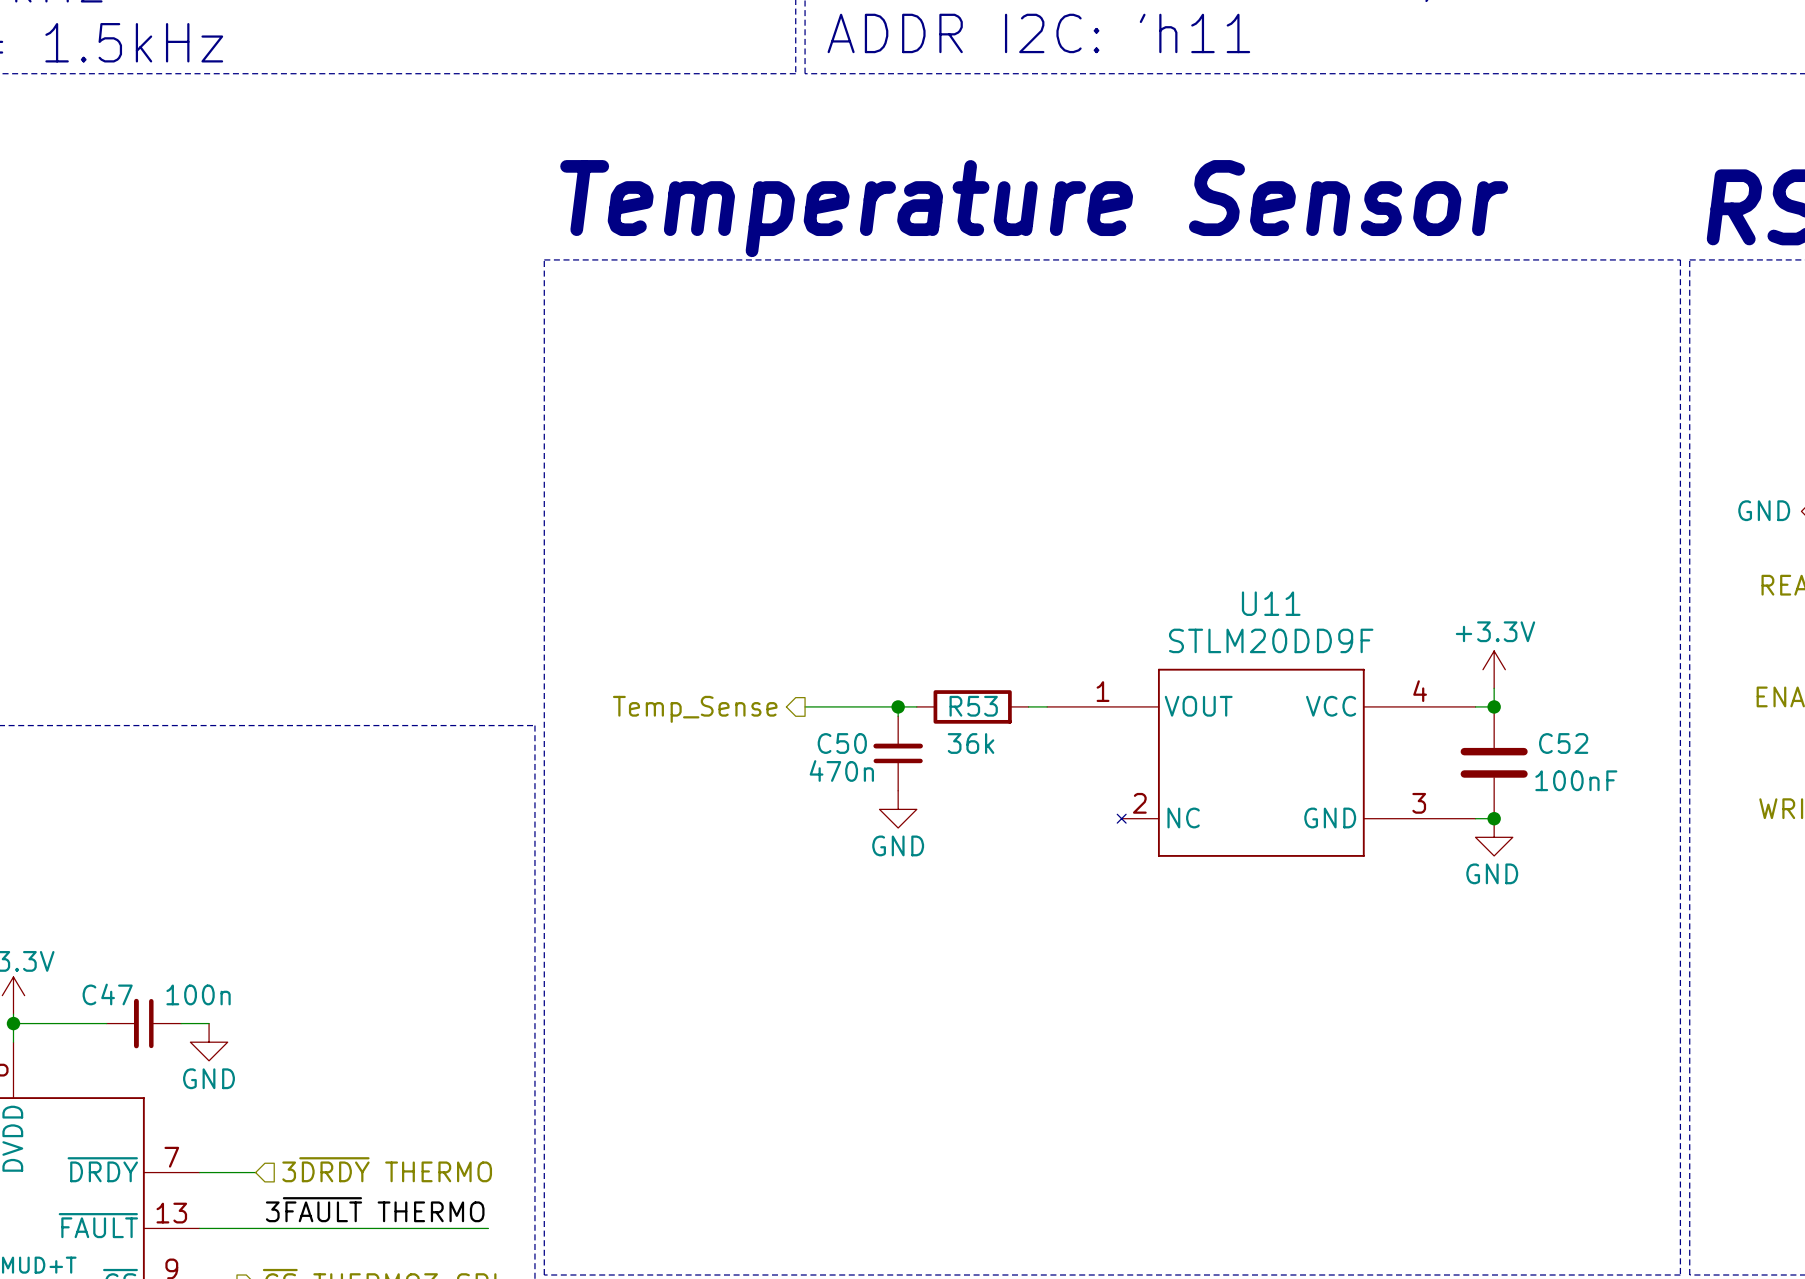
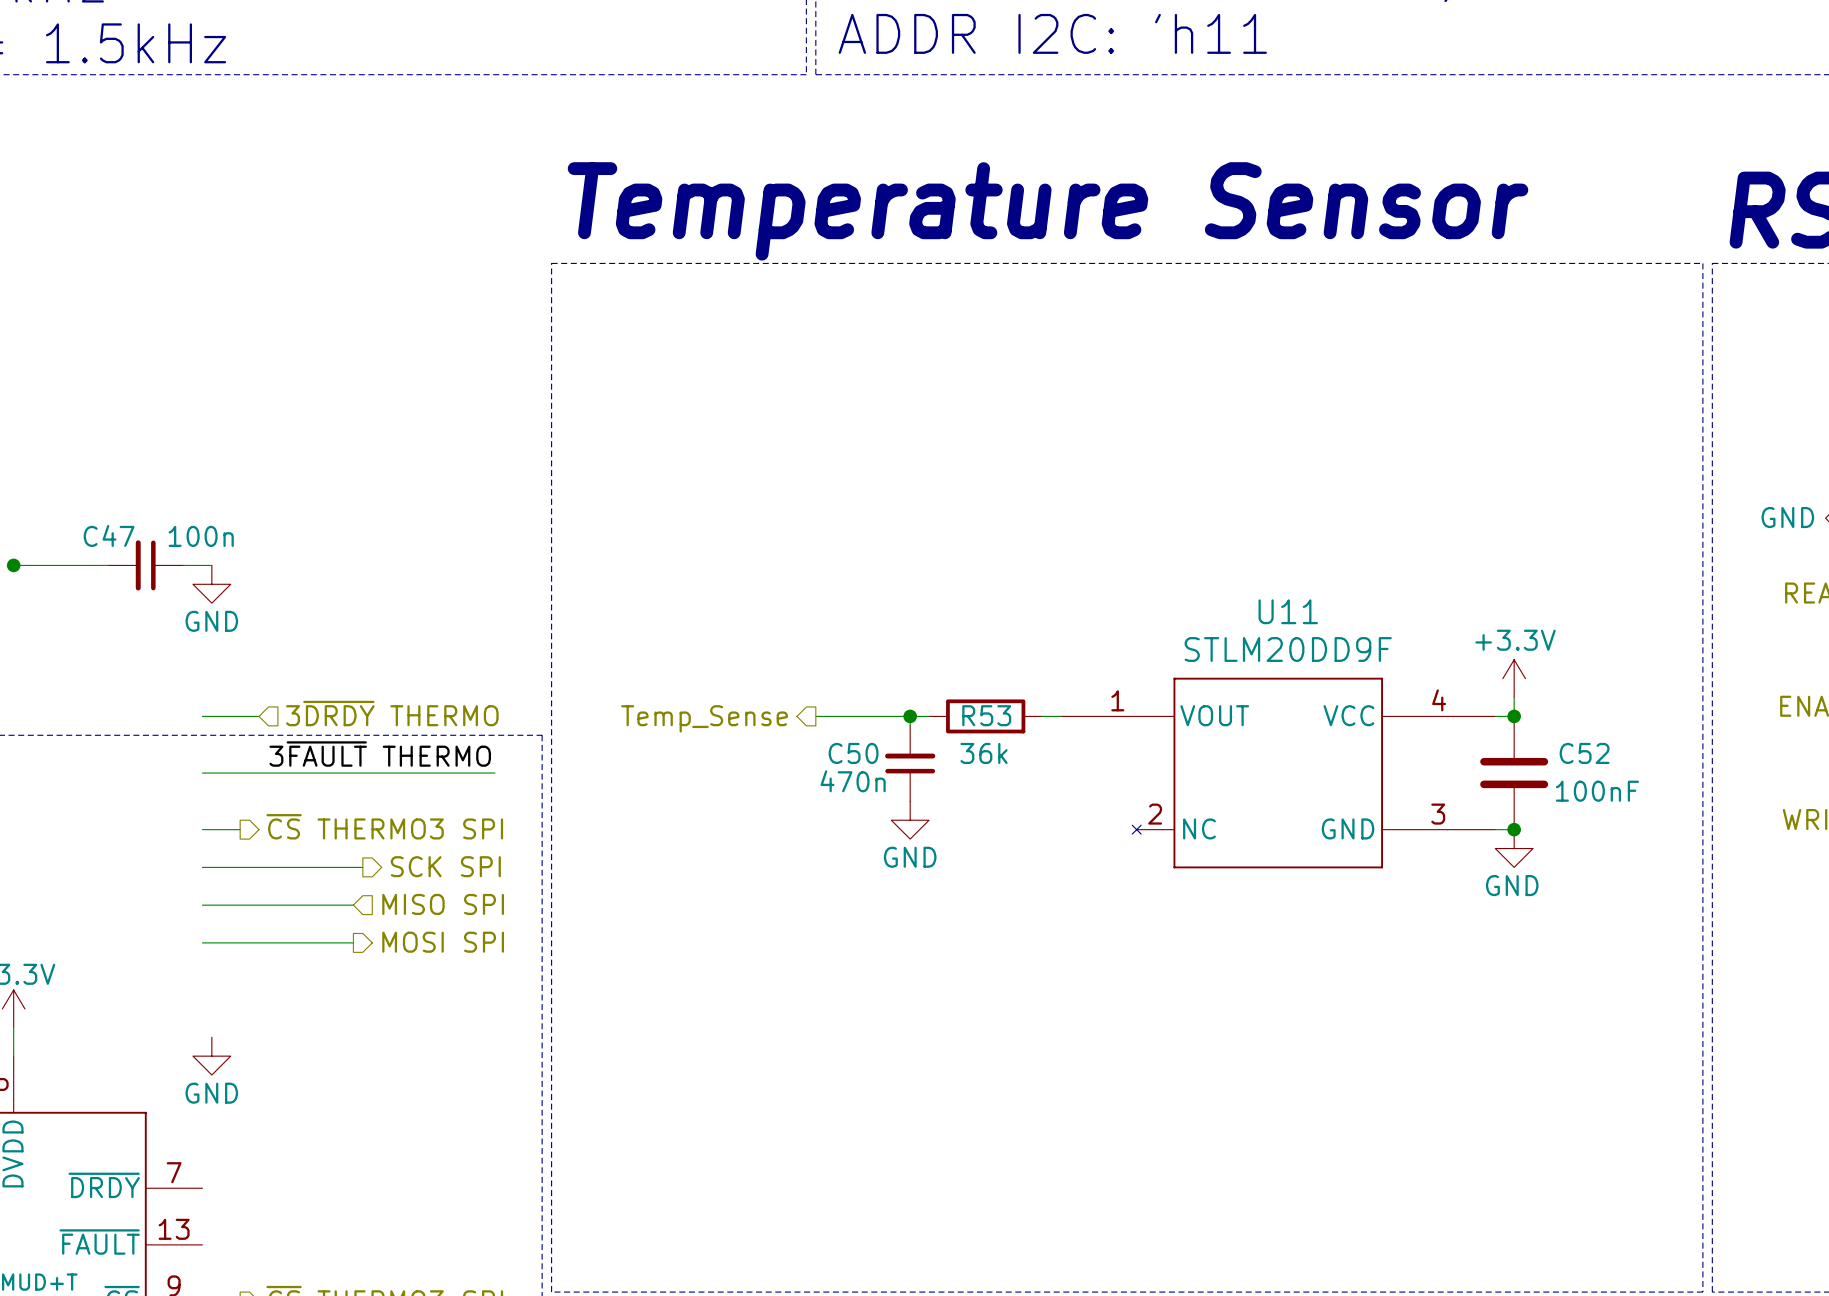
wire: none -> (13, 565) (108, 565)
junction: none -> (13, 565)
wire: none -> (183, 565) (211, 565)
power symbol: none -> GND (211, 584)
hierarchical label: none -> 3~{DRDY} THERMO (392, 713)
wire: none -> (202, 716) (259, 716)
label: none -> 3~{FAULT} THERMO (380, 754)
wire: none -> (202, 773) (494, 773)
hierarchical label: none -> ~{CS} THERMO3 SPI (384, 826)
wire: none -> (202, 829) (240, 829)
wire: none -> (202, 867) (362, 867)
hierarchical label: none -> SCK SPI (445, 866)
hierarchical label: none -> MISO SPI (443, 904)
wire: none -> (202, 905) (353, 905)
hierarchical label: none -> MOSI SPI (443, 942)
wire: none -> (202, 942) (353, 942)
wire: (13, 1023) (106, 1023) -> none
junction: (13, 1023) -> none
C47 position: (143, 1023) -> (145, 565)
wire: (181, 1023) (209, 1023) -> none
hierarchical label: 3~{DRDY} THERMO (387, 1169) -> none
wire: (199, 1172) (255, 1172) -> none
label: 3~{FAULT} THERMO (375, 1209) -> none
wire: (199, 1228) (488, 1228) -> none

